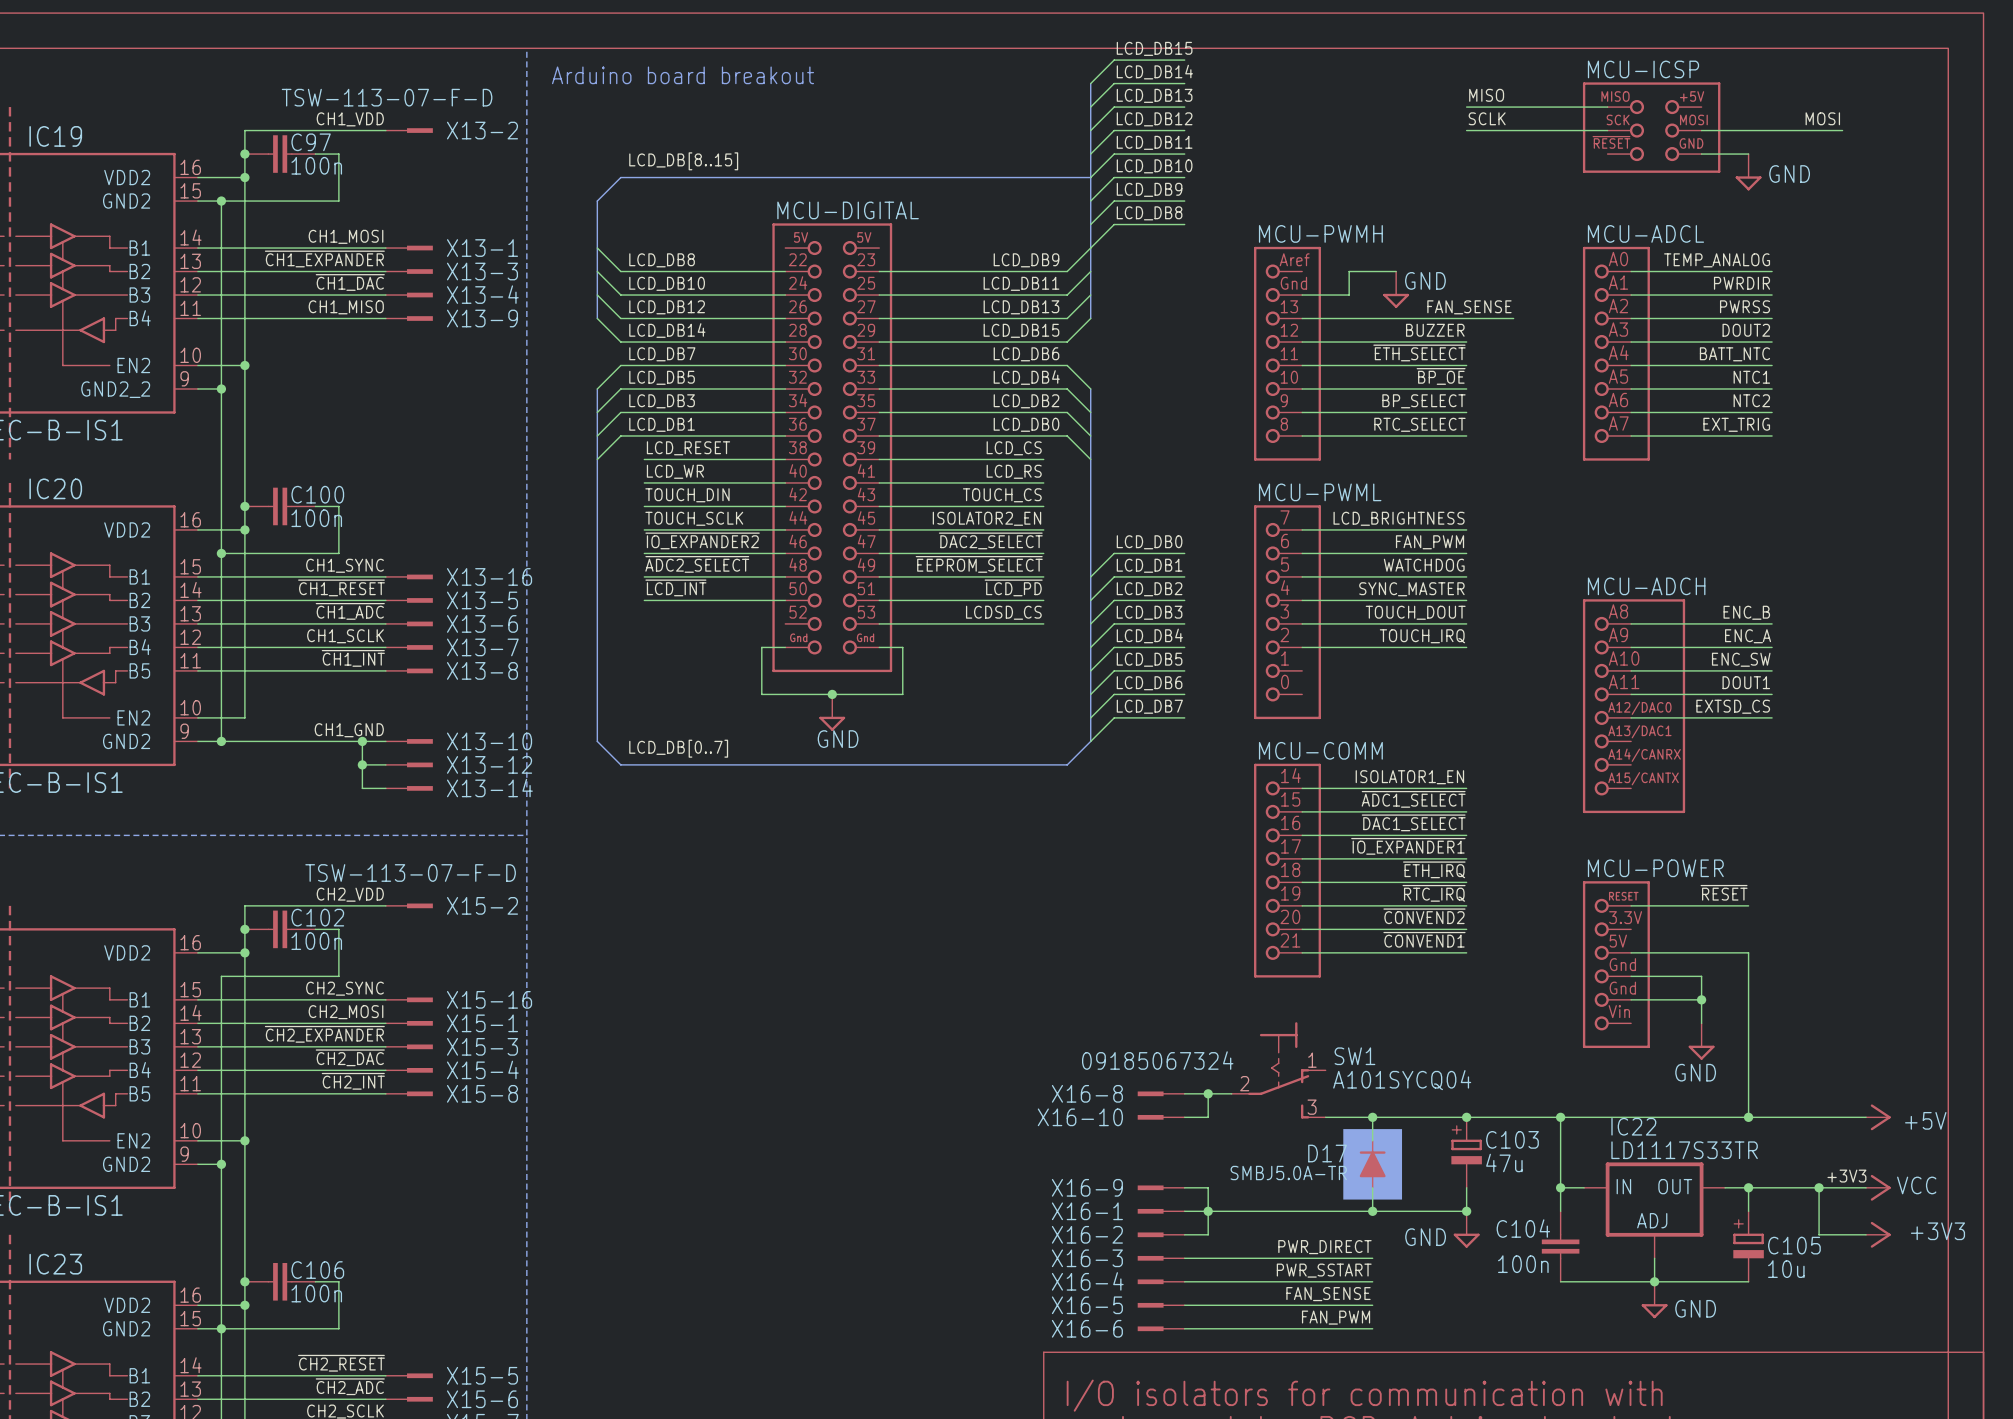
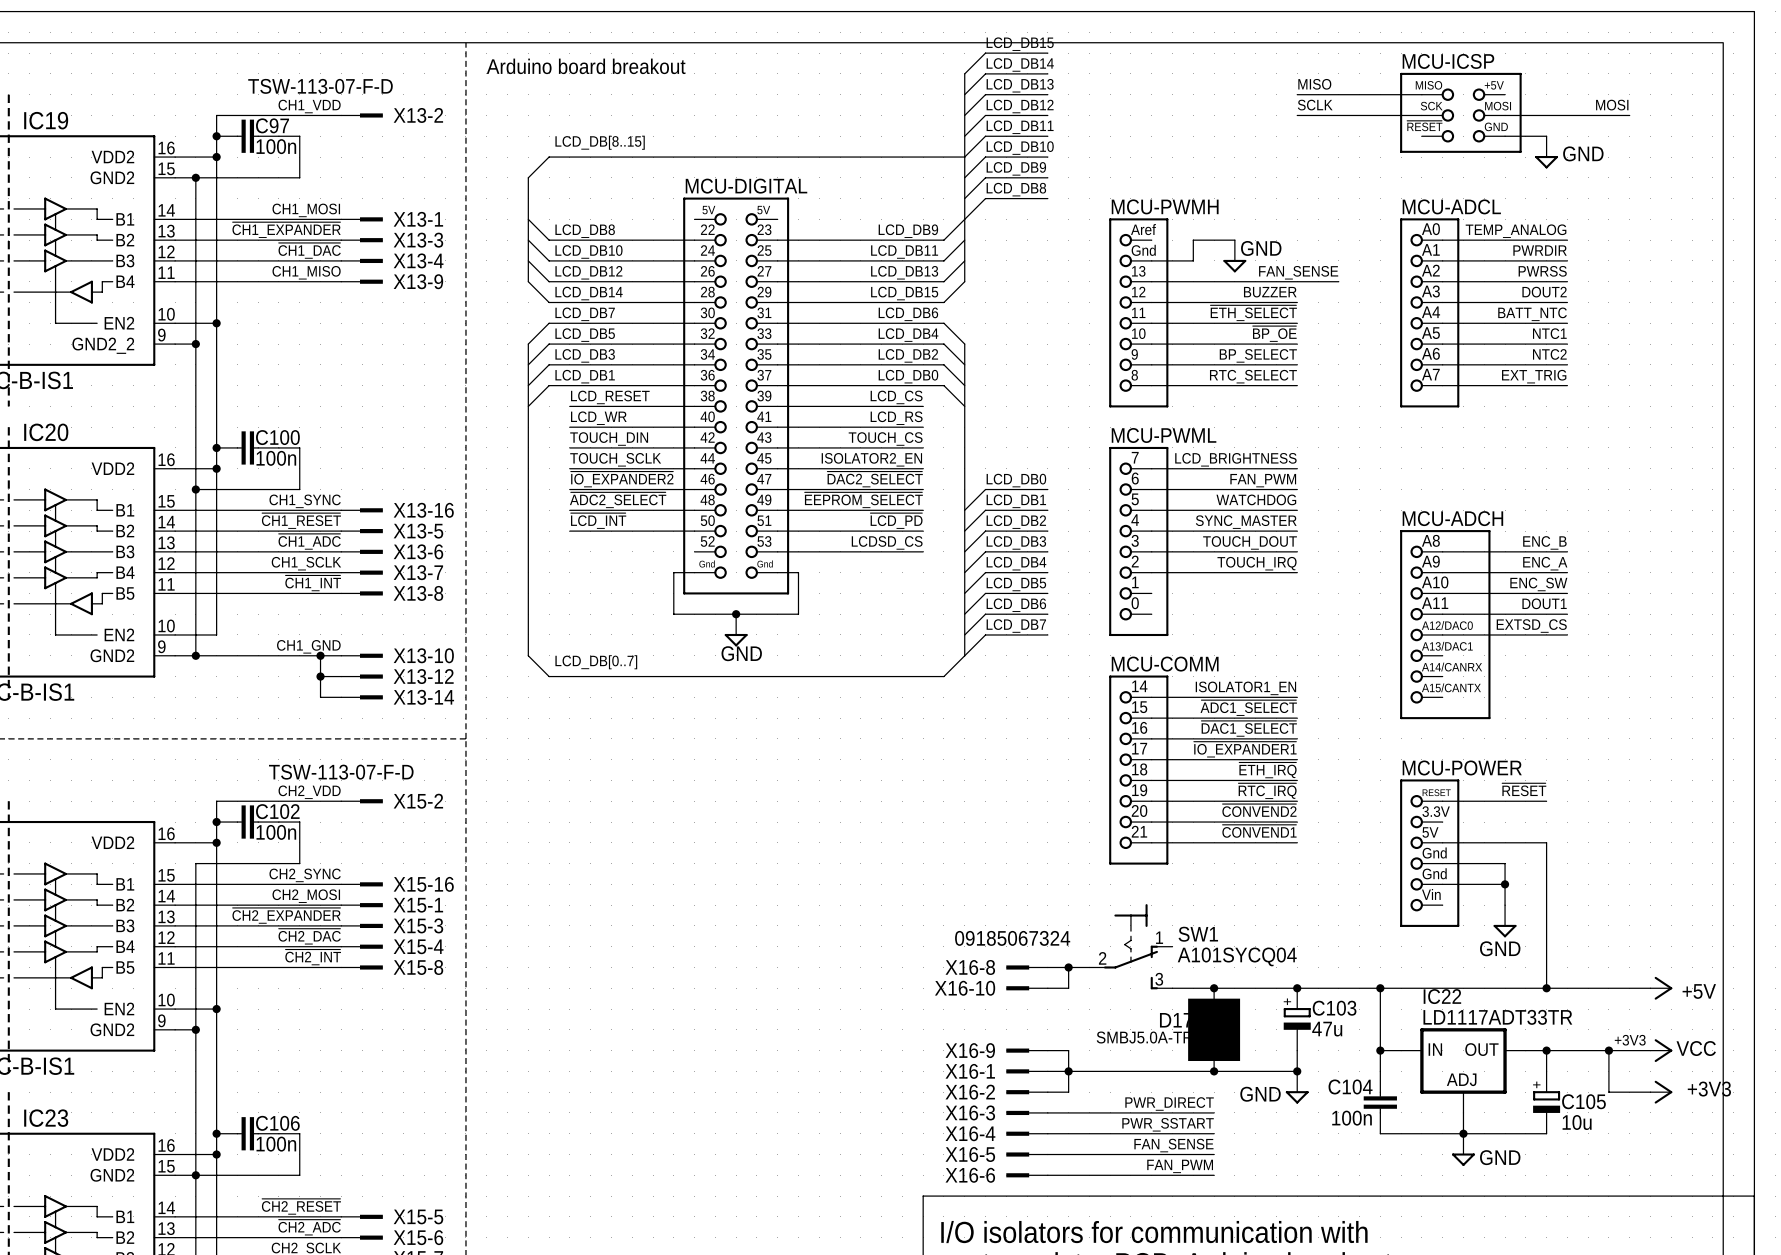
IC22 value: LD1117S33TR (1684, 1150) -> LD1117ADT33TR (1497, 1017)

